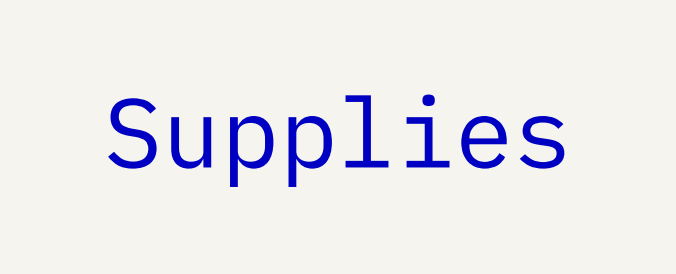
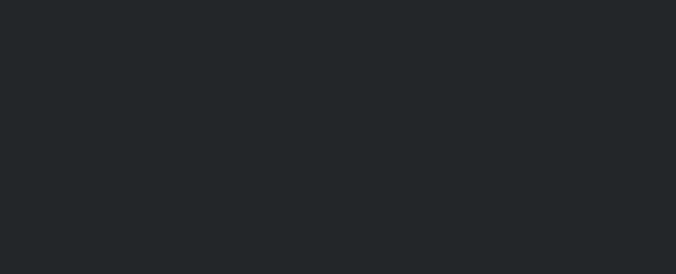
text: Supplies (336, 140) -> none

